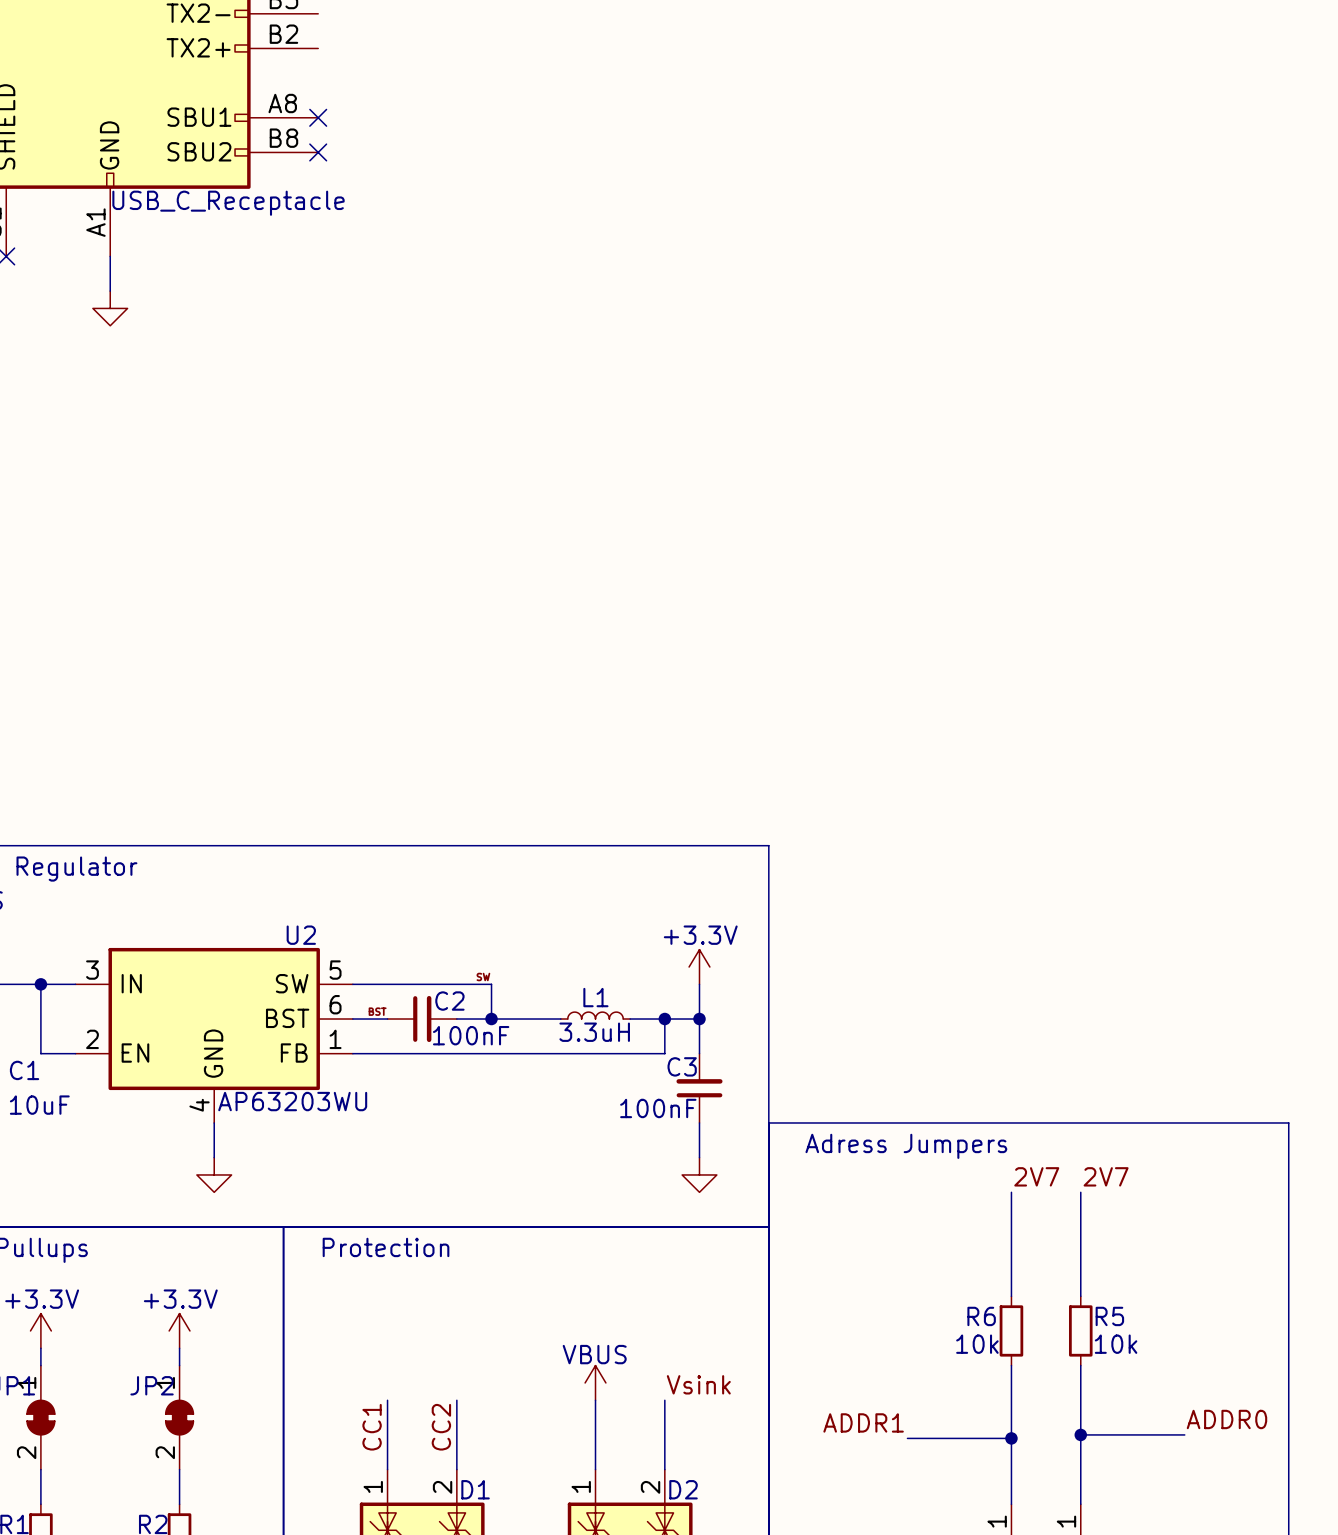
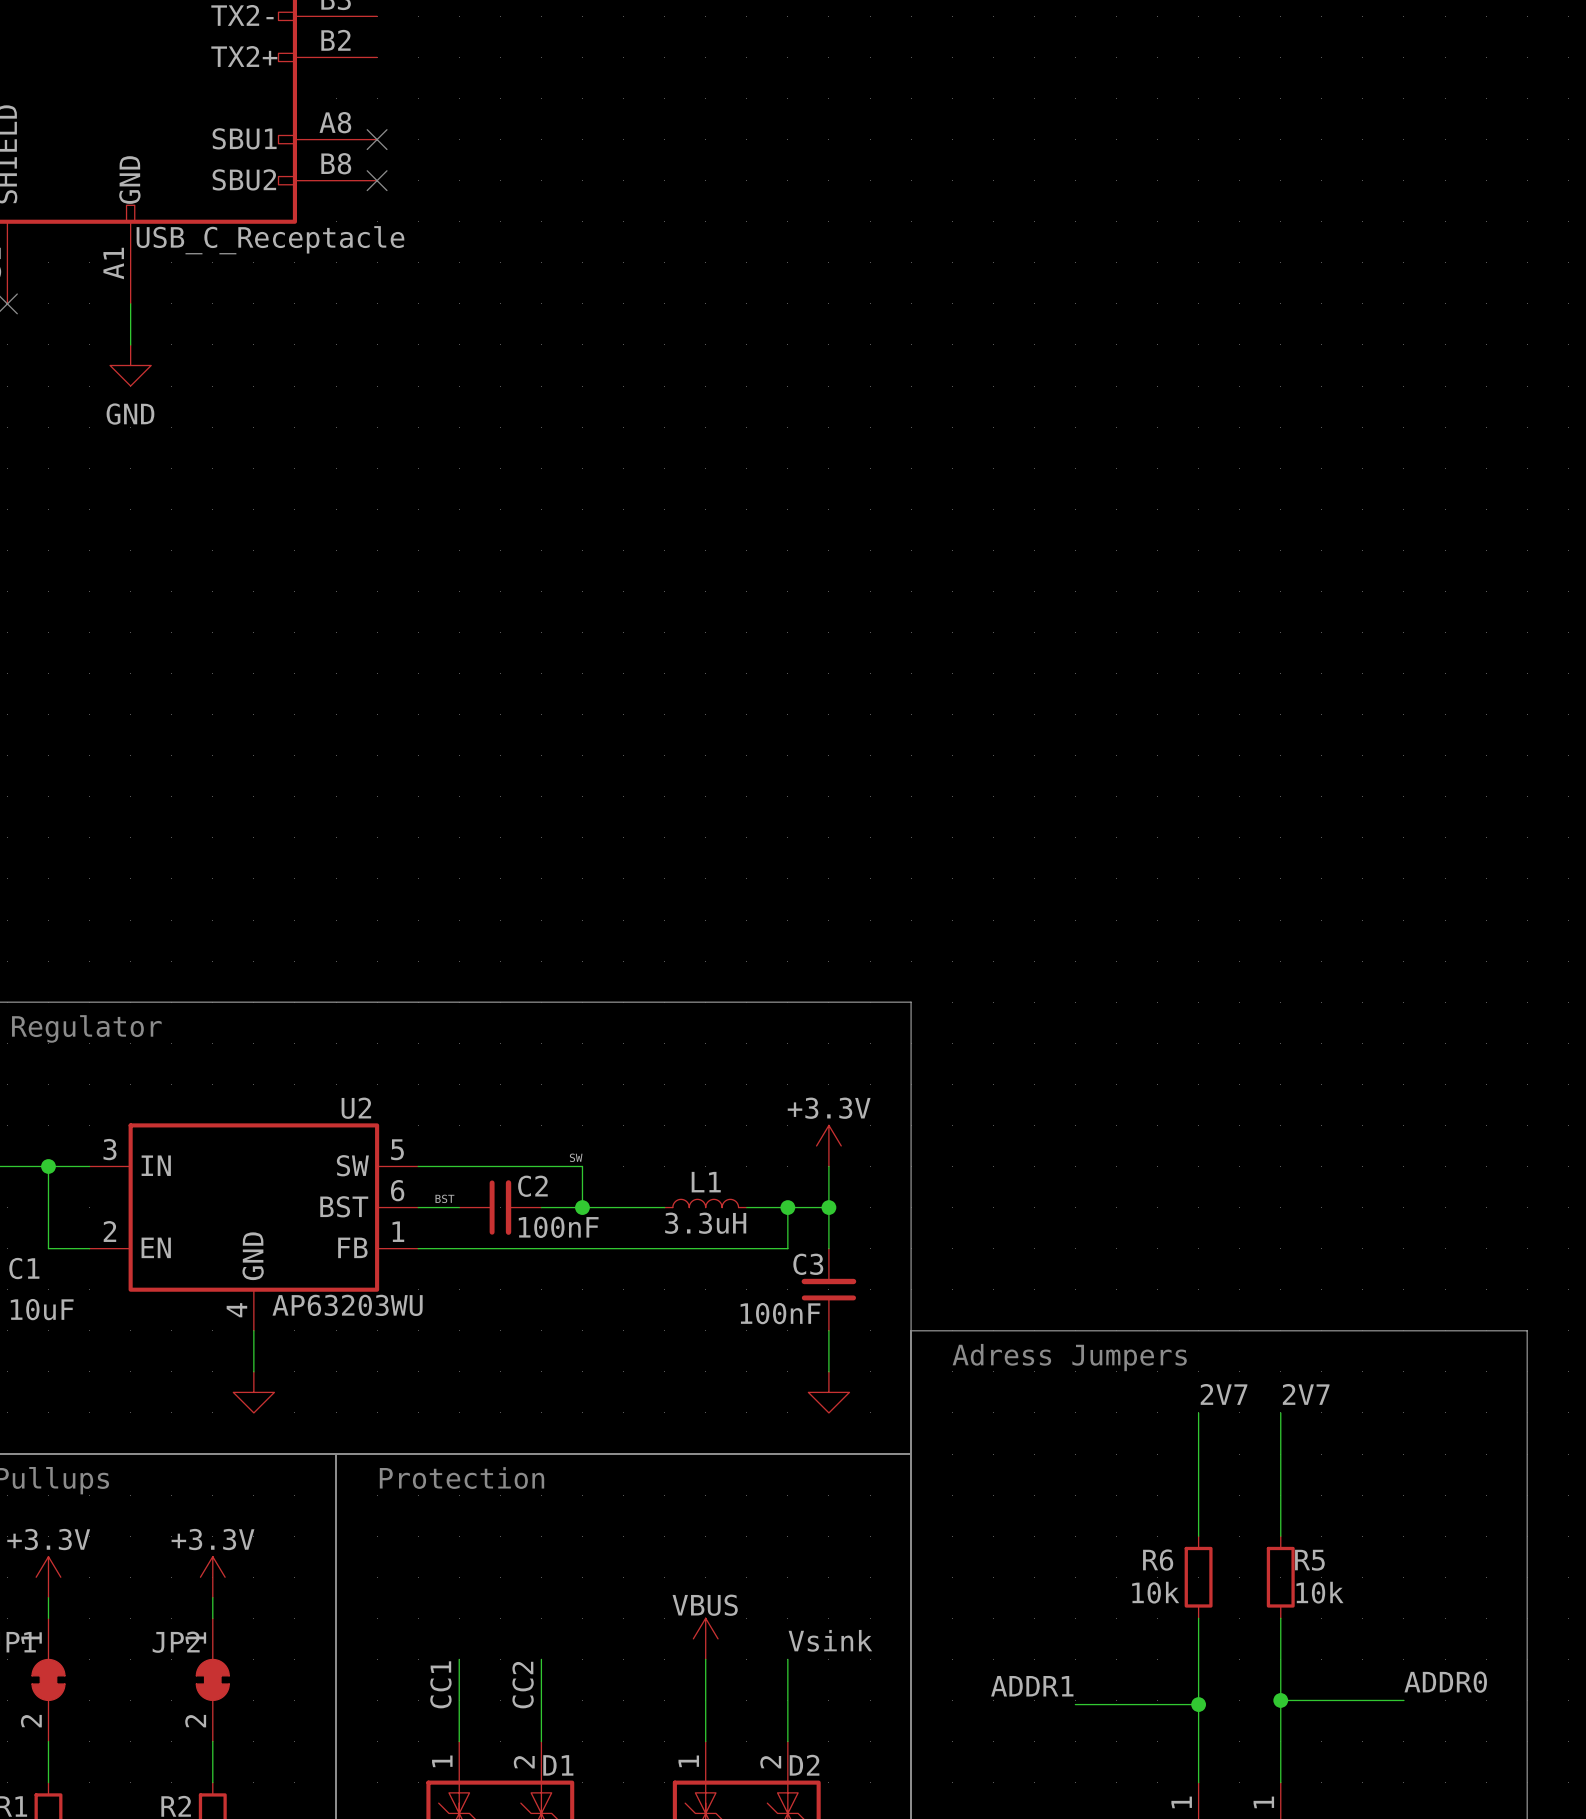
power symbol text: none -> GND (130, 414)

